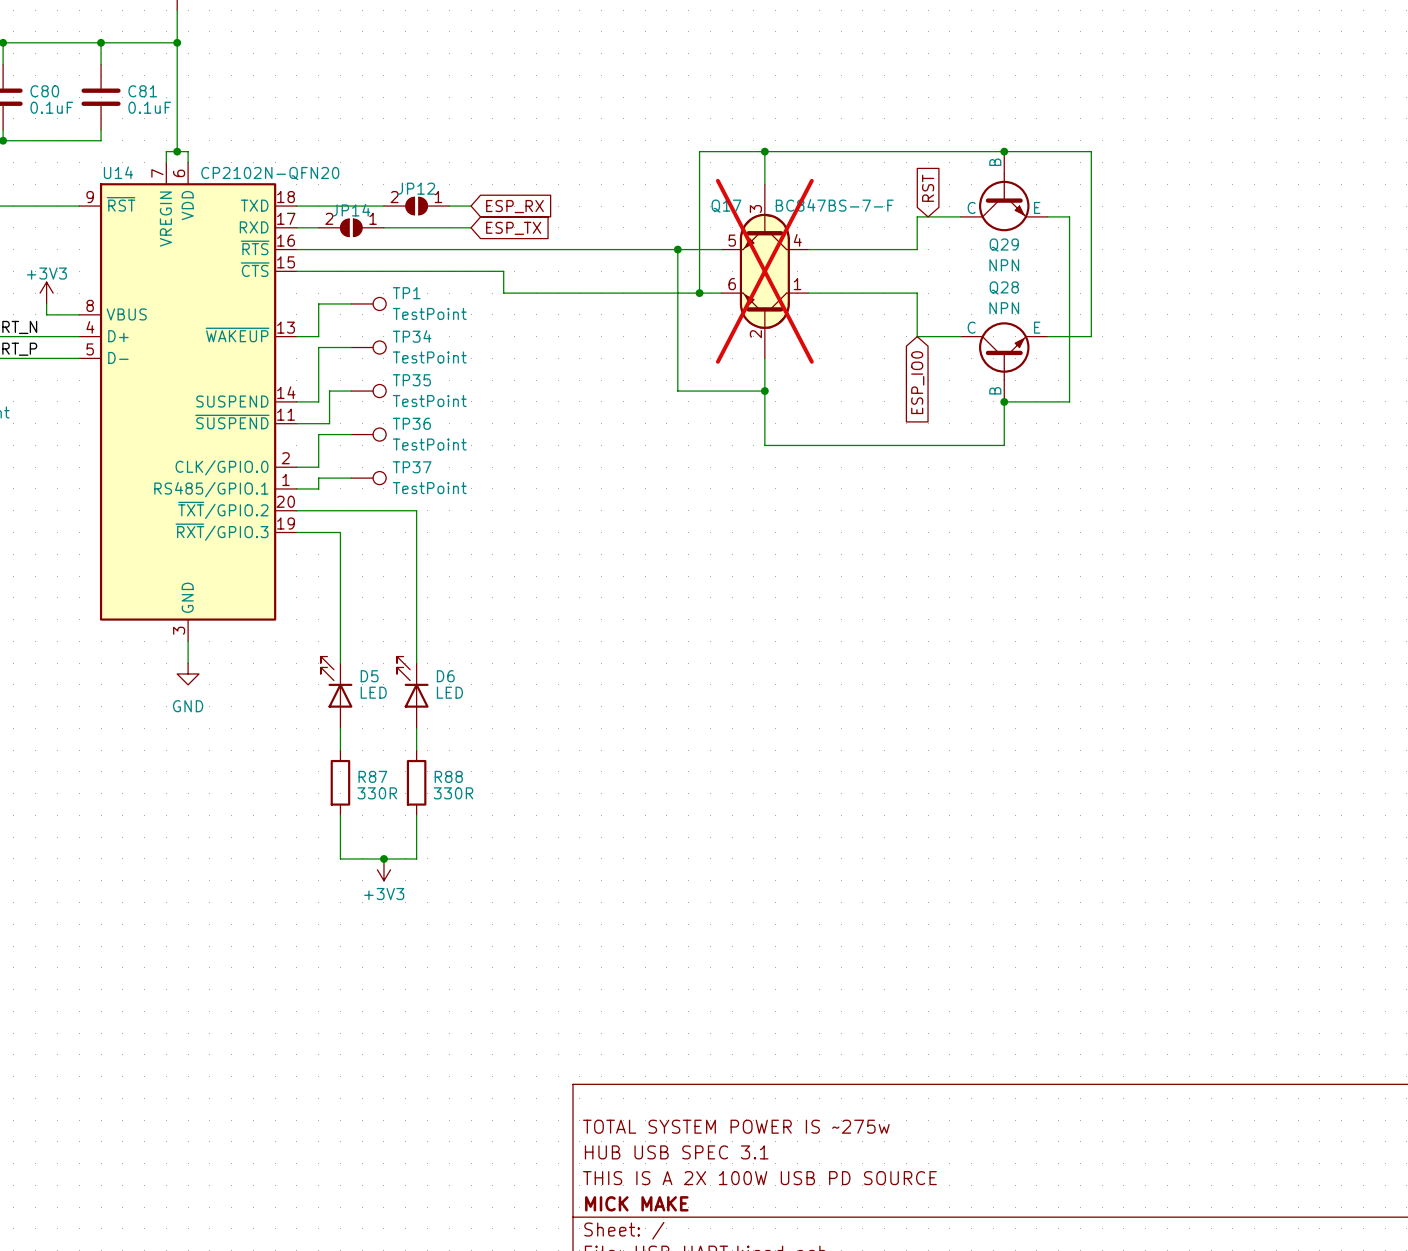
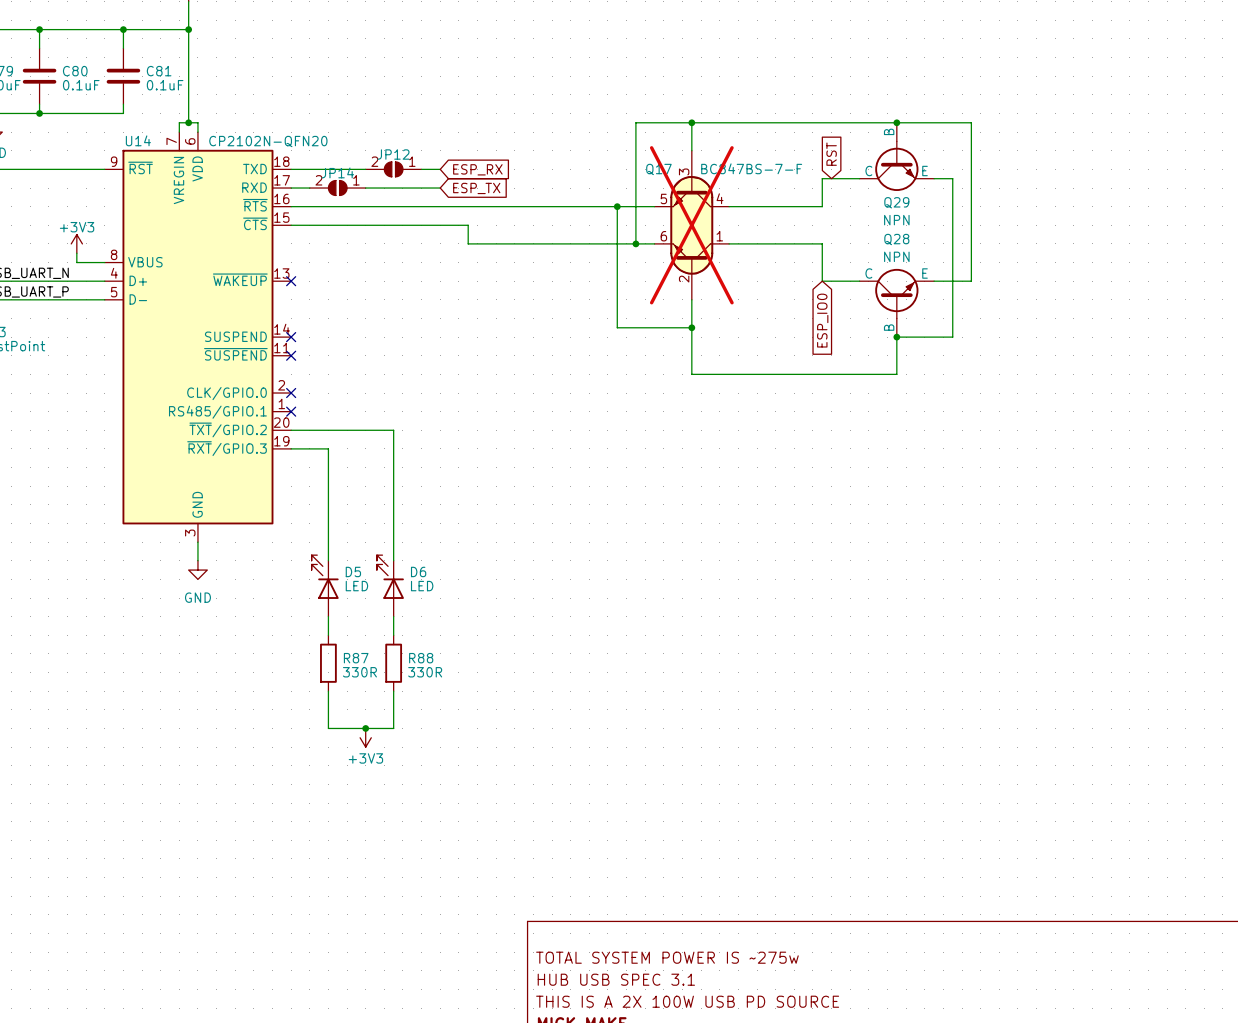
wire: (351, 303) (318, 303) (318, 336) (296, 336) -> none
TP1: TestPoint (368, 303) -> none
no-connect mark: none -> (291, 281)
wire: (351, 347) (318, 347) (318, 401) (296, 401) -> none
TP34: TestPoint (368, 347) -> none
wire: (351, 391) (329, 391) (329, 423) (296, 423) -> none
TP35: TestPoint (368, 391) -> none
no-connect mark: none -> (291, 337)
no-connect mark: none -> (291, 355)
wire: (351, 434) (318, 434) (318, 467) (296, 467) -> none
TP36: TestPoint (368, 434) -> none
no-connect mark: none -> (291, 393)
wire: (351, 478) (318, 478) (318, 488) (296, 488) -> none
TP37: TestPoint (368, 478) -> none
no-connect mark: none -> (291, 411)

